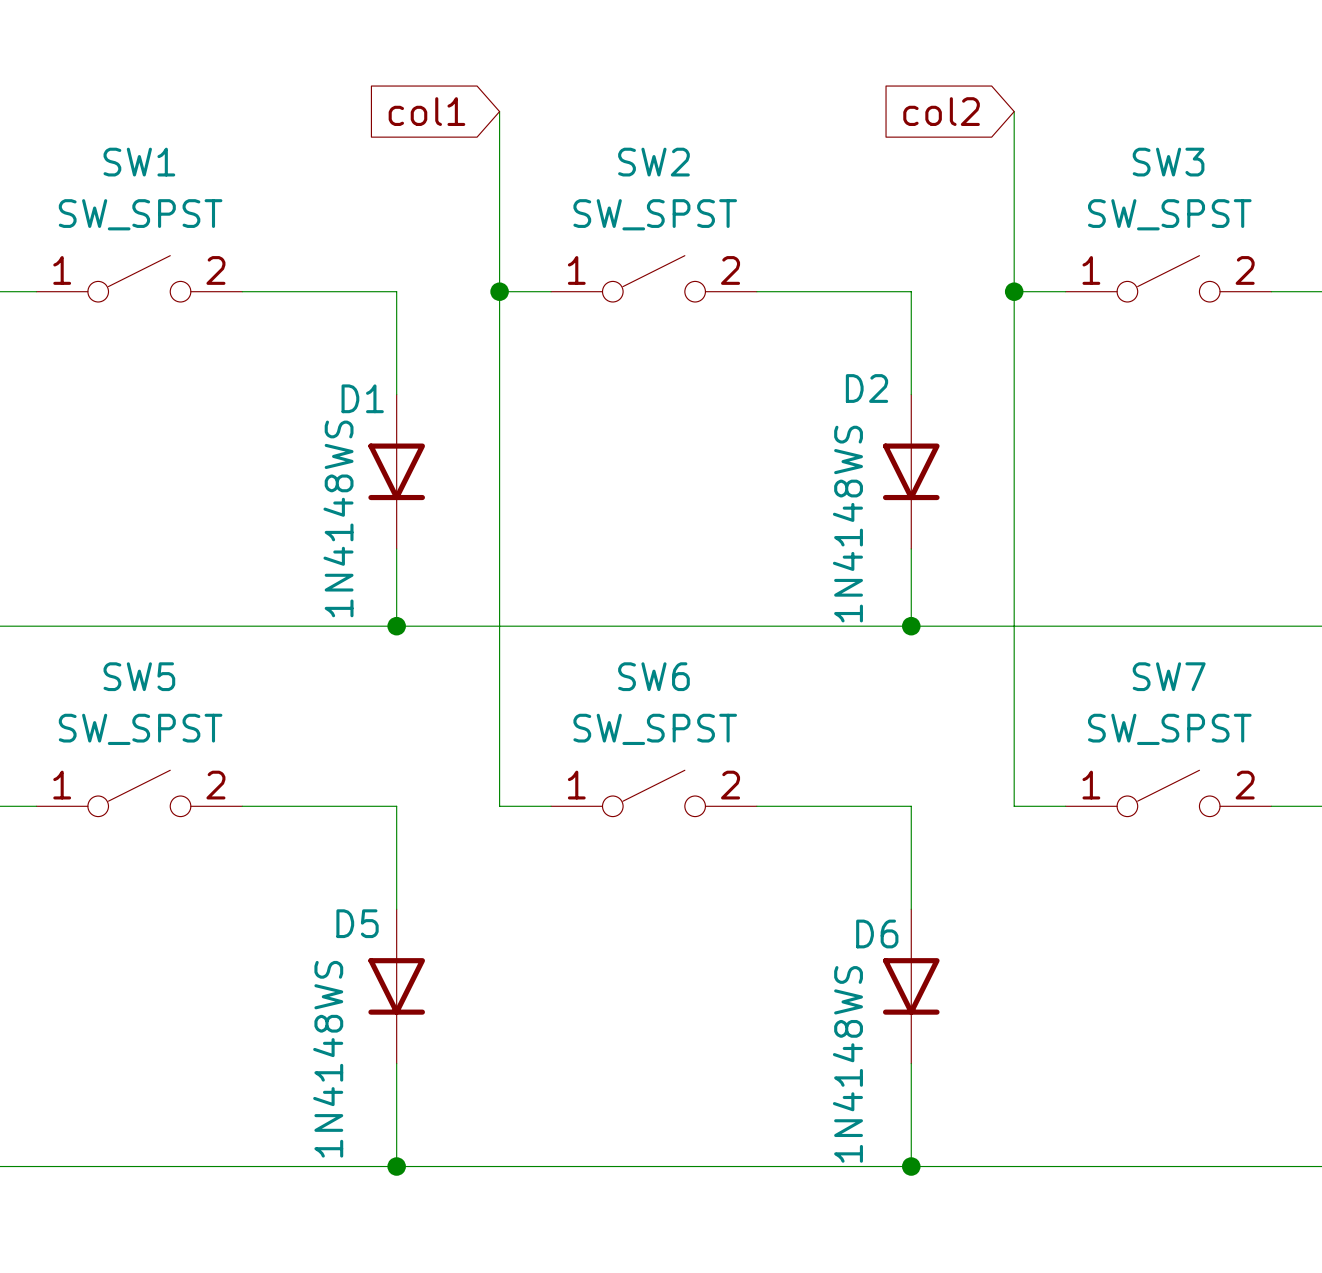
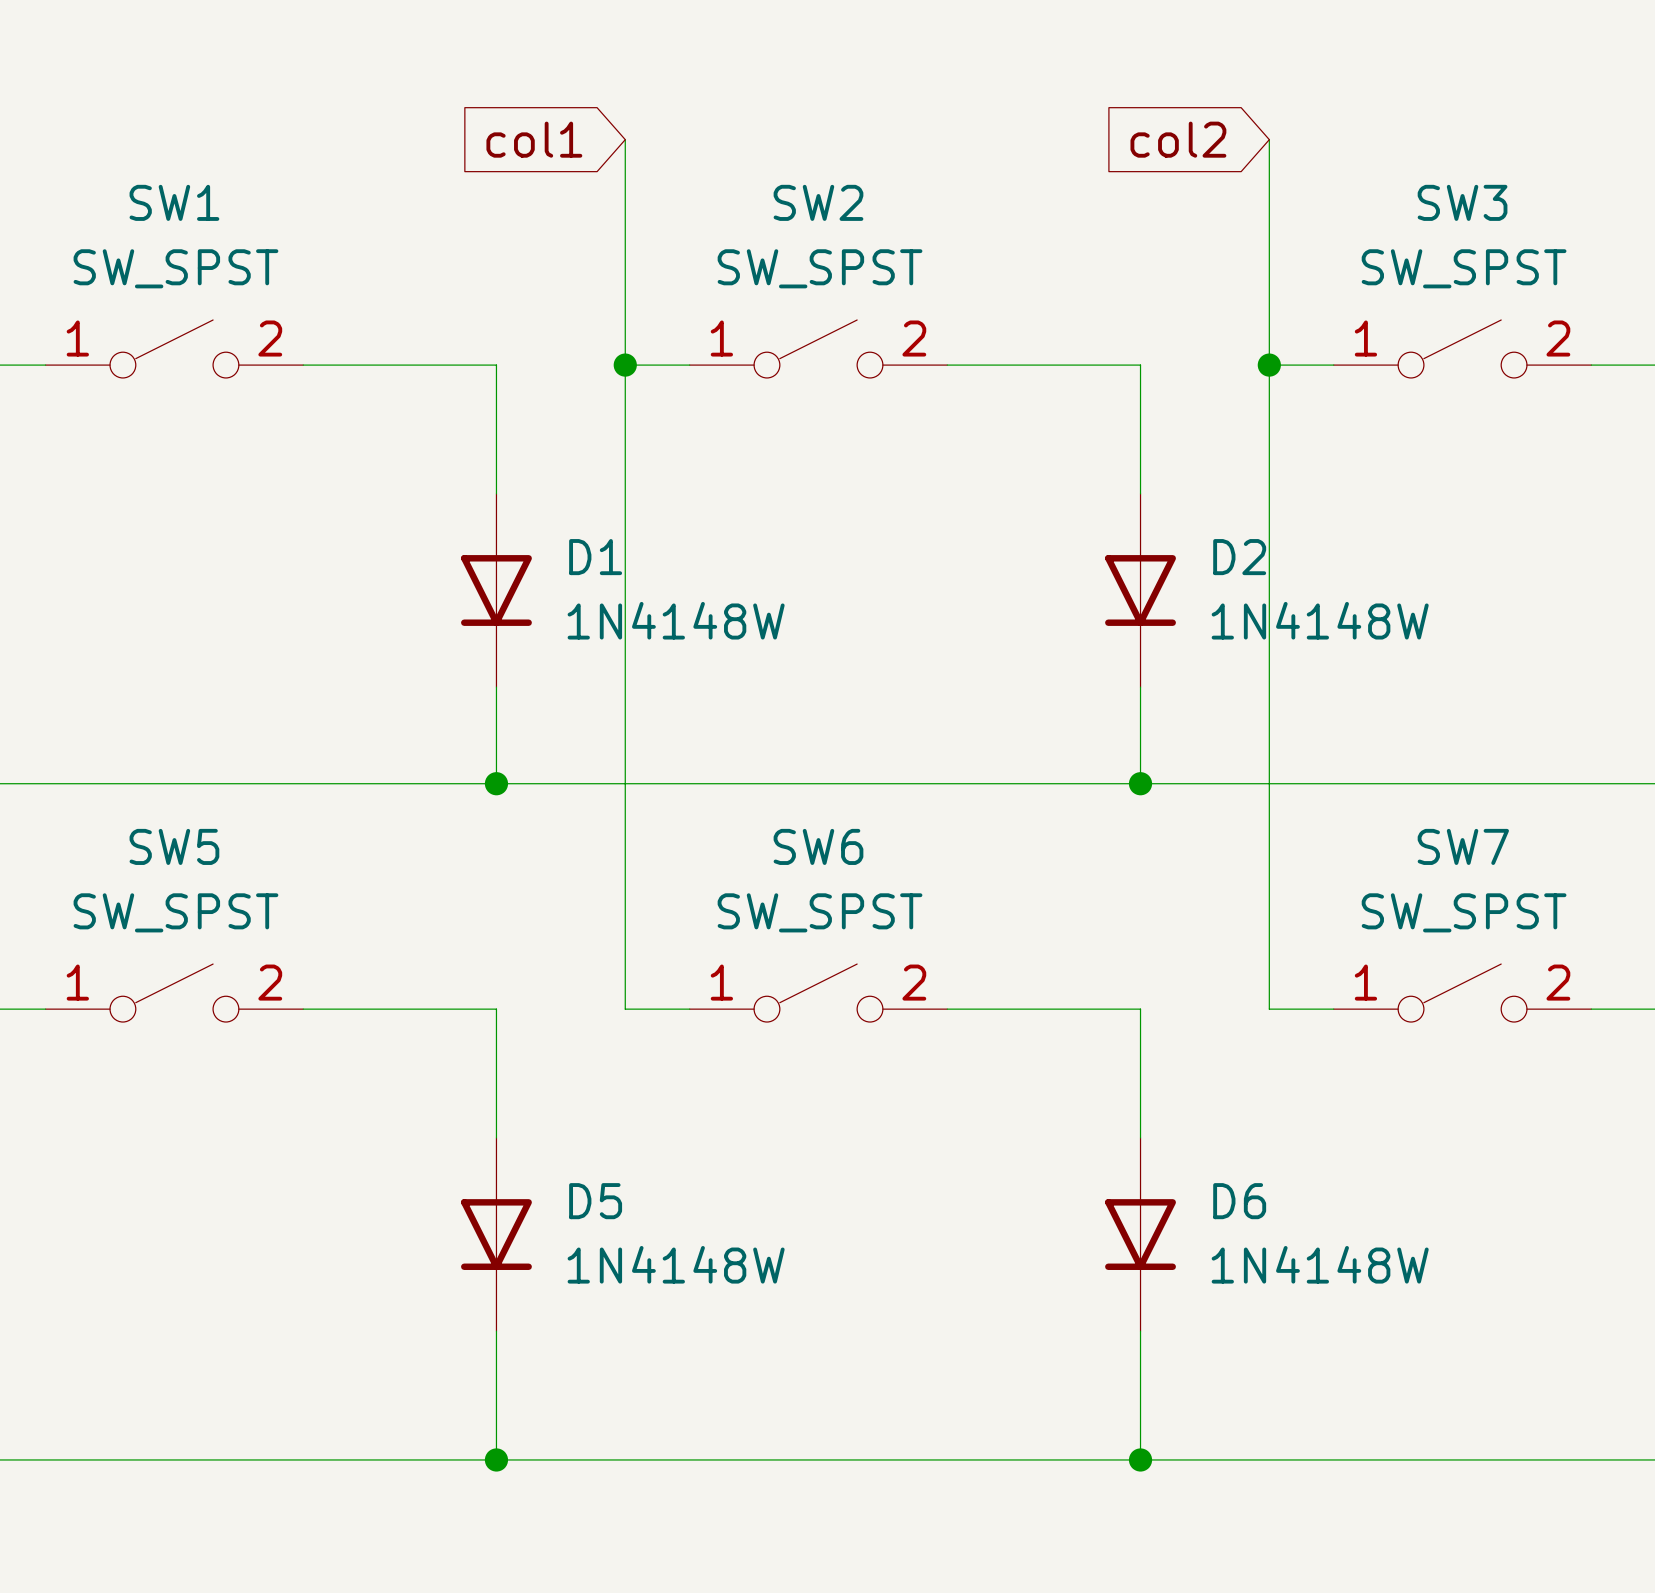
D2 name position: D2 (866, 388) -> D2 (1239, 557)
D1 name position: D1 (362, 398) -> D1 (595, 557)
D1 value: 1N4148WS (338, 518) -> 1N4148W (676, 620)
D2 value: 1N4148WS (847, 524) -> 1N4148W (1320, 620)
D5 name position: D5 (357, 923) -> D5 (595, 1201)
D6 name position: D6 (877, 933) -> D6 (1239, 1201)
D5 value: 1N4148WS (328, 1059) -> 1N4148W (676, 1264)
D6 value: 1N4148WS (847, 1064) -> 1N4148W (1320, 1264)

